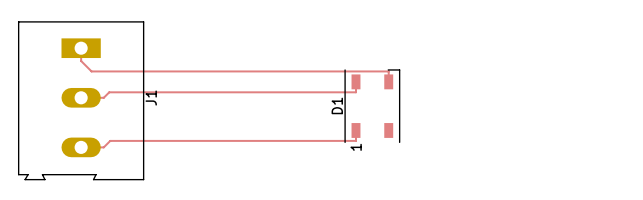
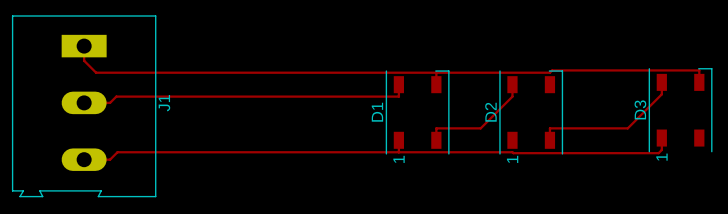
track: none -> (436, 72) (699, 70) (699, 82)
track: none -> (661, 82) (661, 94) (627, 128) (549, 128) (549, 140)
track: none -> (512, 84) (512, 96) (480, 128) (436, 128) (436, 140)
D3: none -> (680, 110)
D2: none -> (531, 112)
track: none -> (661, 138) (661, 149) (658, 153) (398, 152)

